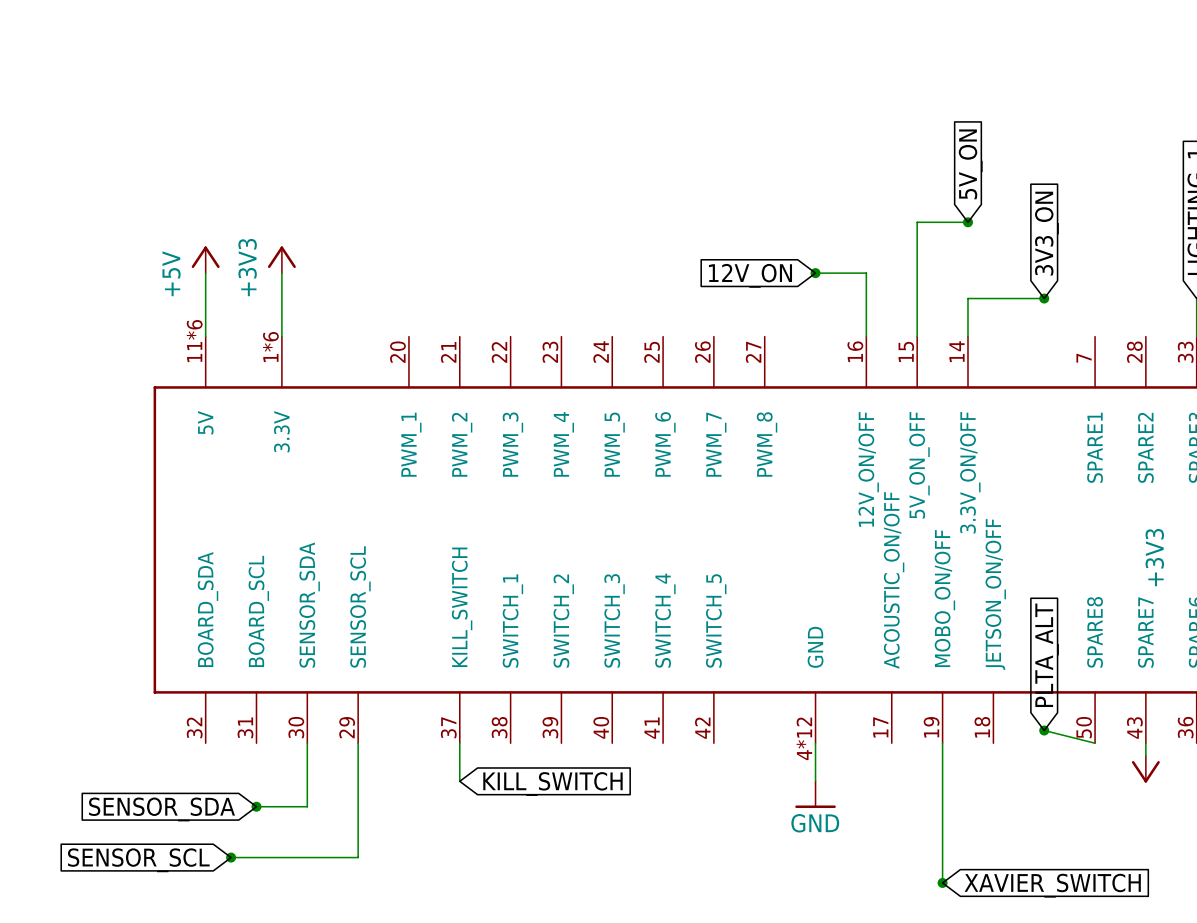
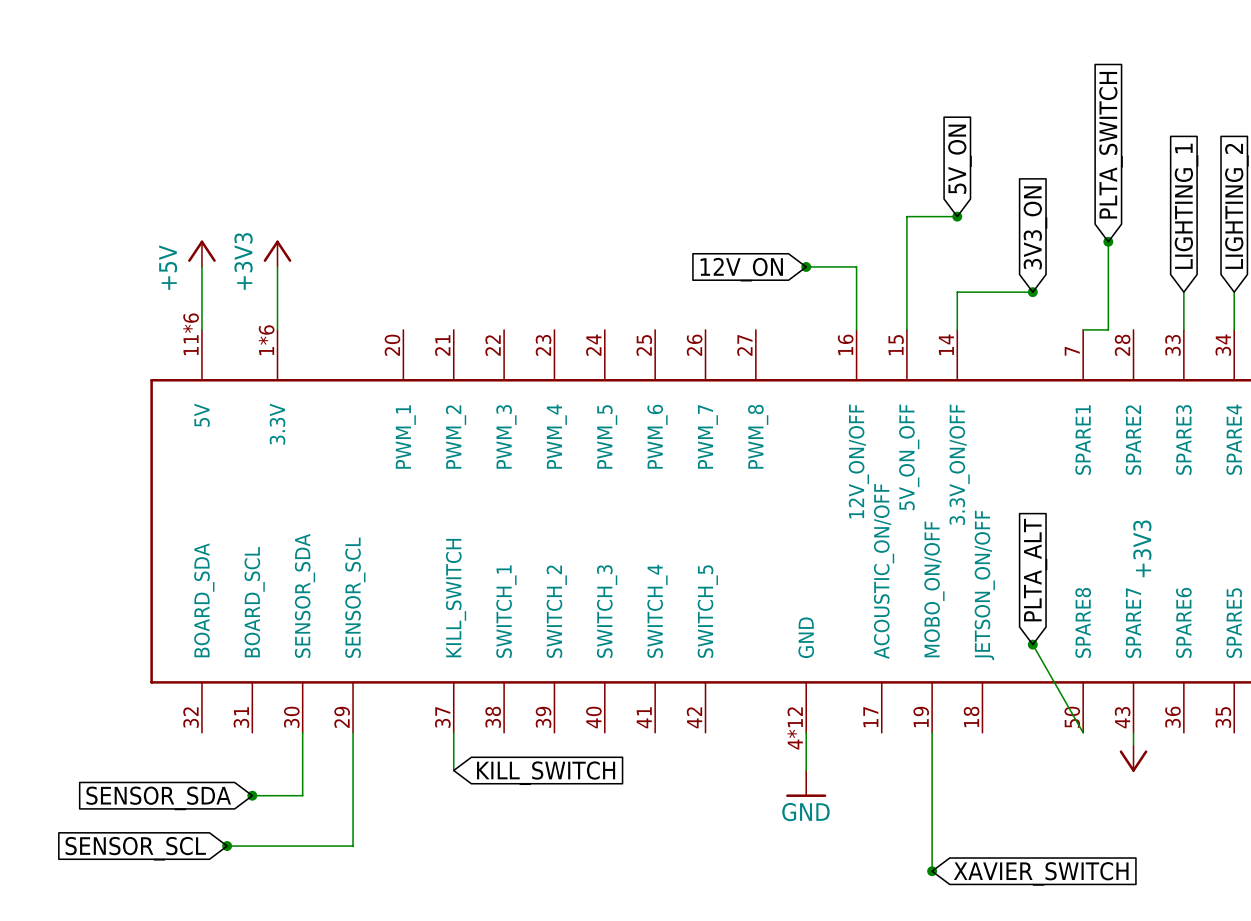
global label: none -> PLTA_SWITCH (1111, 145)
wire: none -> (1108, 241) (1108, 329) (1083, 329)
junction: none -> (1108, 241)
junction: none -> (1032, 644)
global label position: PLTA_ALT (1047, 655) -> PLTA_ALT (1035, 570)
wire: (1044, 730) (1095, 743) -> (1032, 644) (1083, 732)
junction: (1044, 730) -> none

